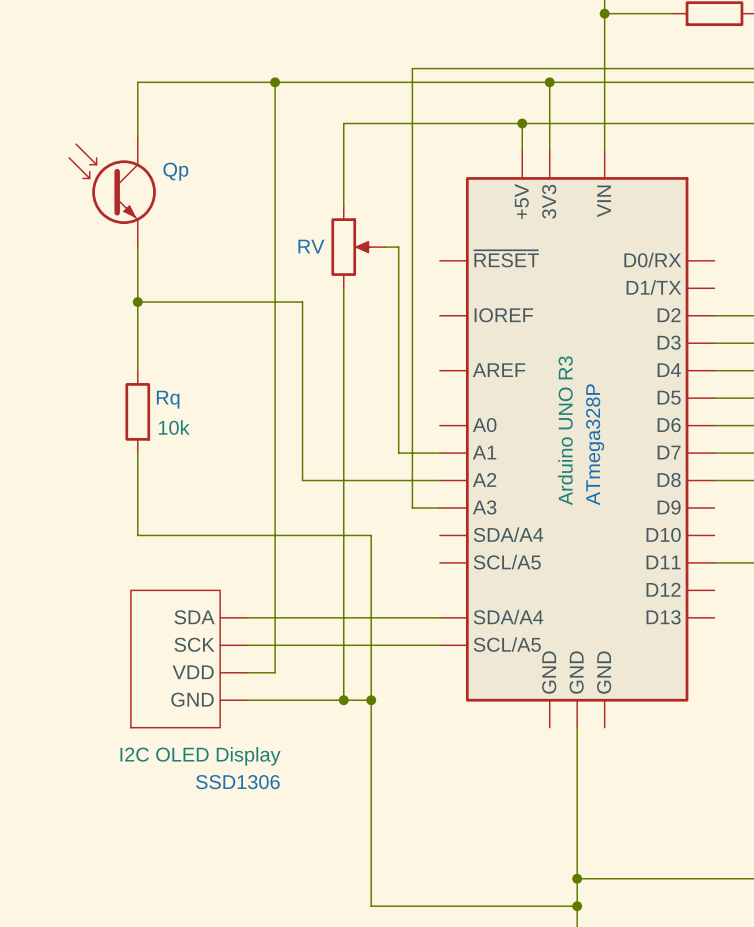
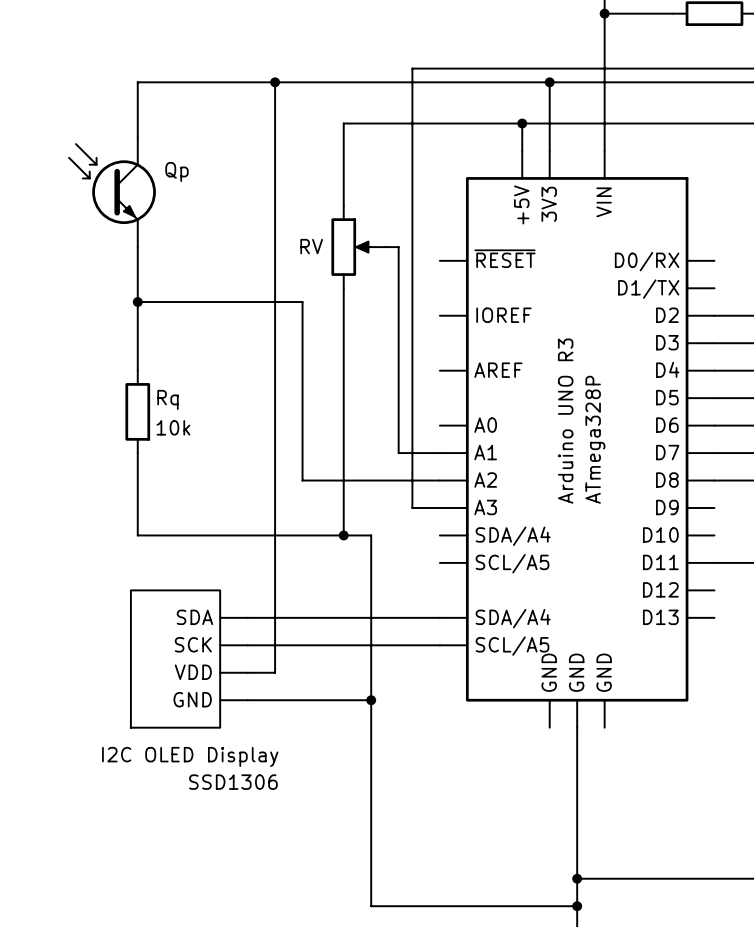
wire: (343, 535) (343, 700) -> none
junction: none -> (343, 535)
junction: (343, 700) -> none

